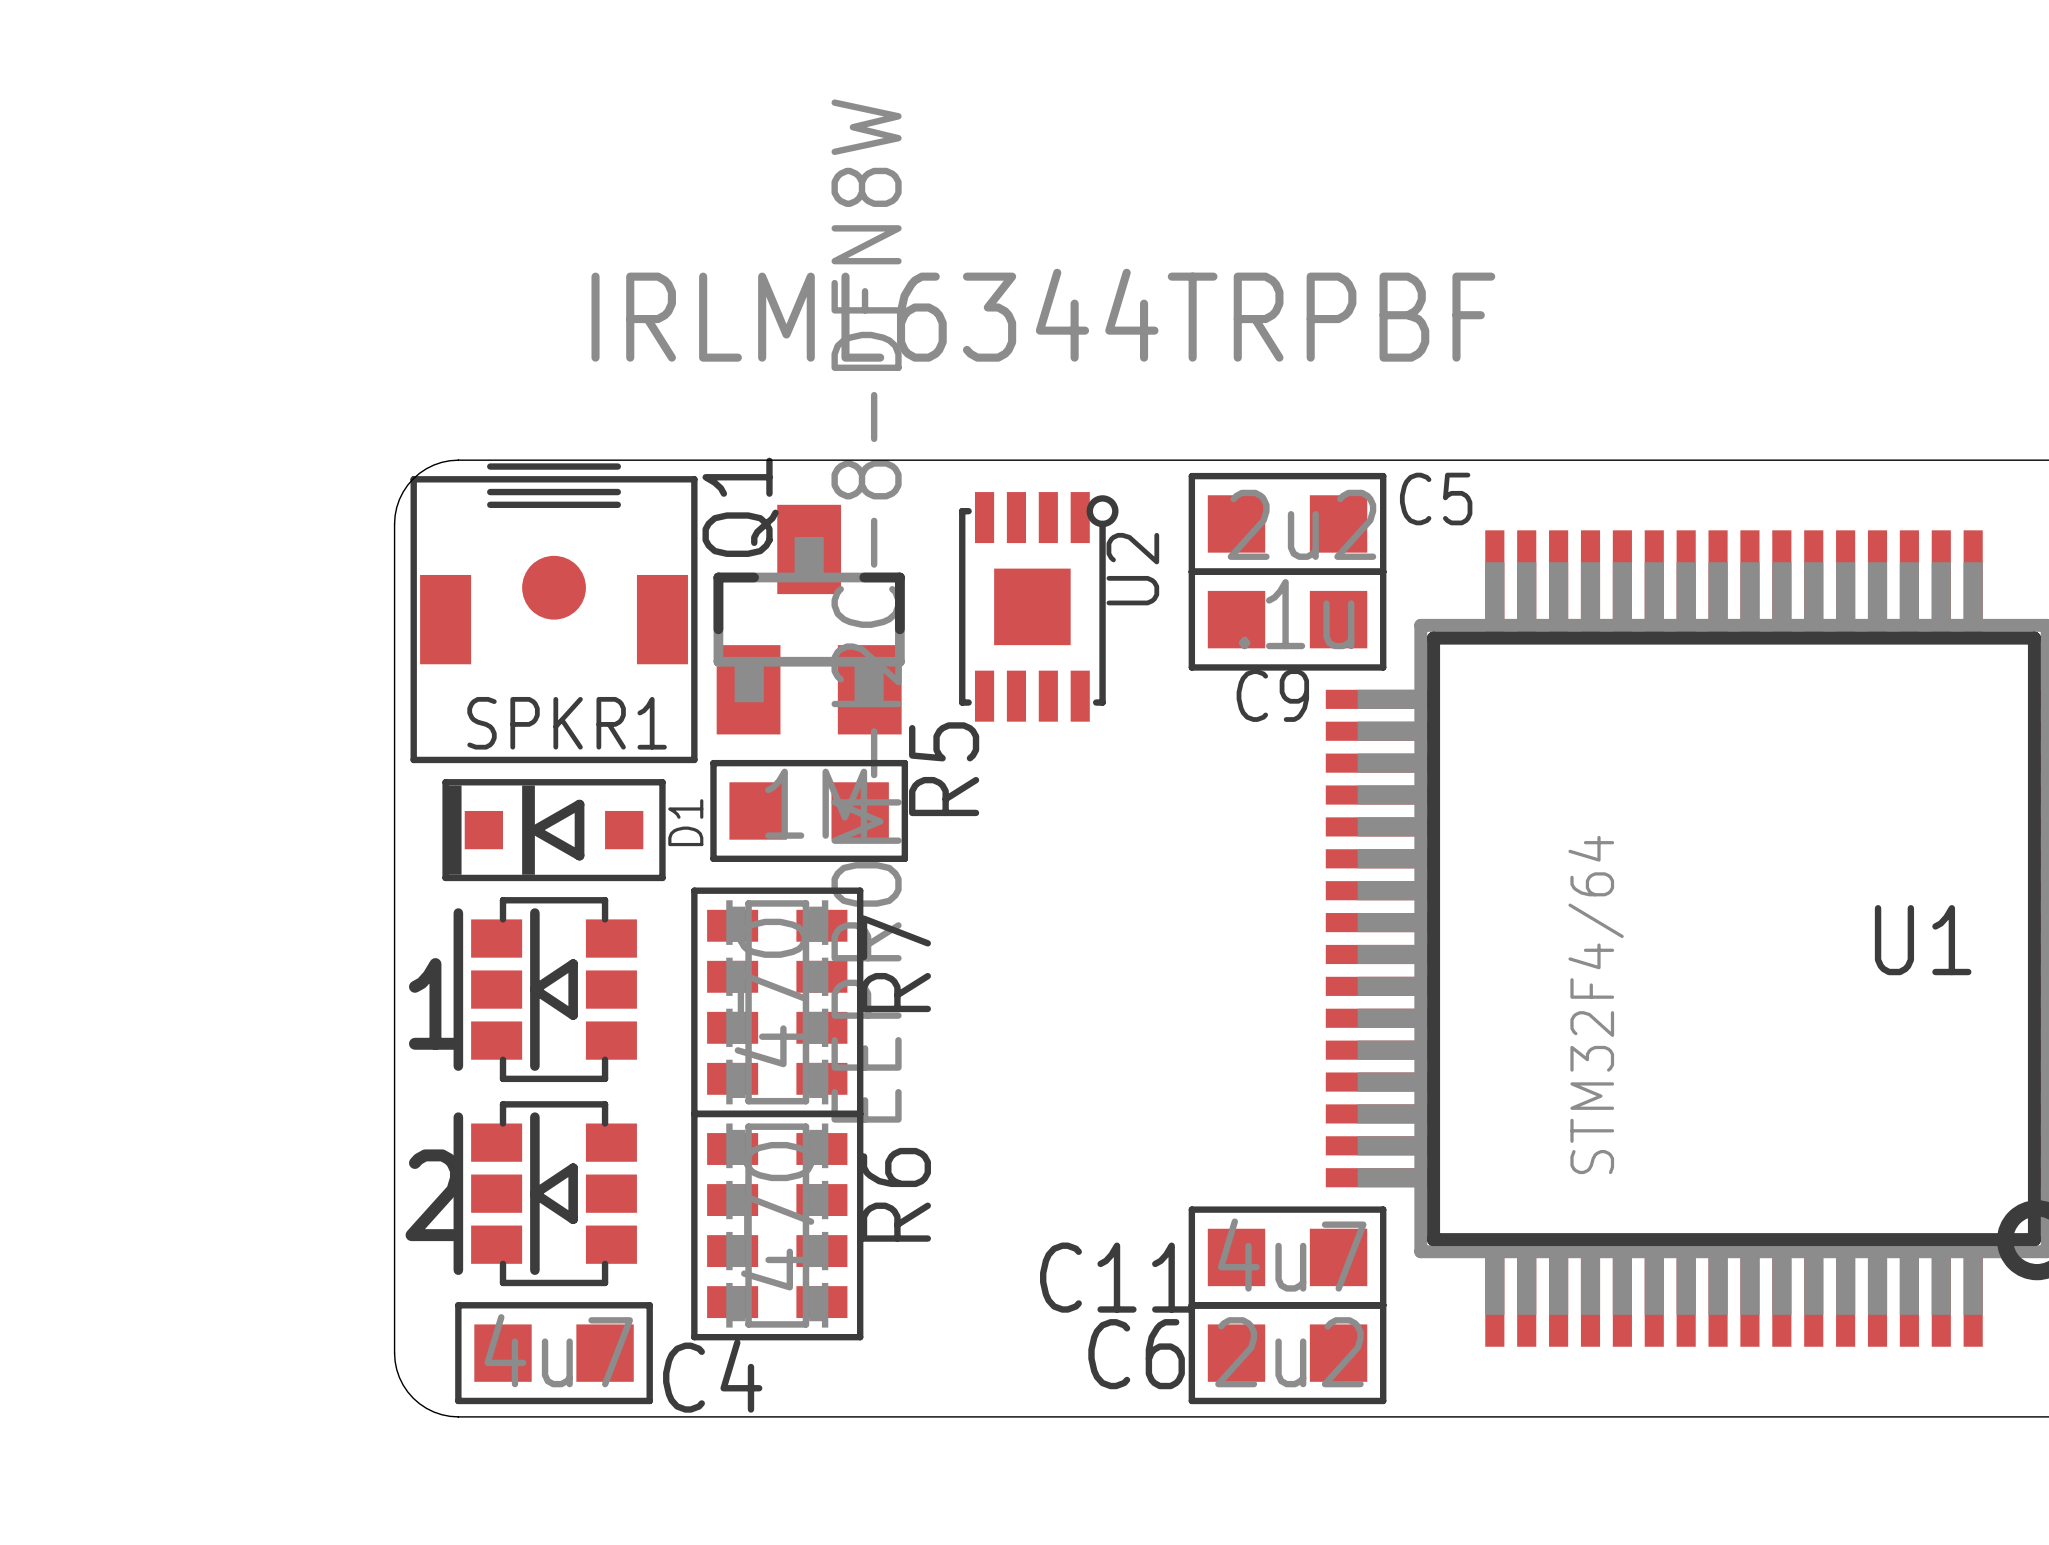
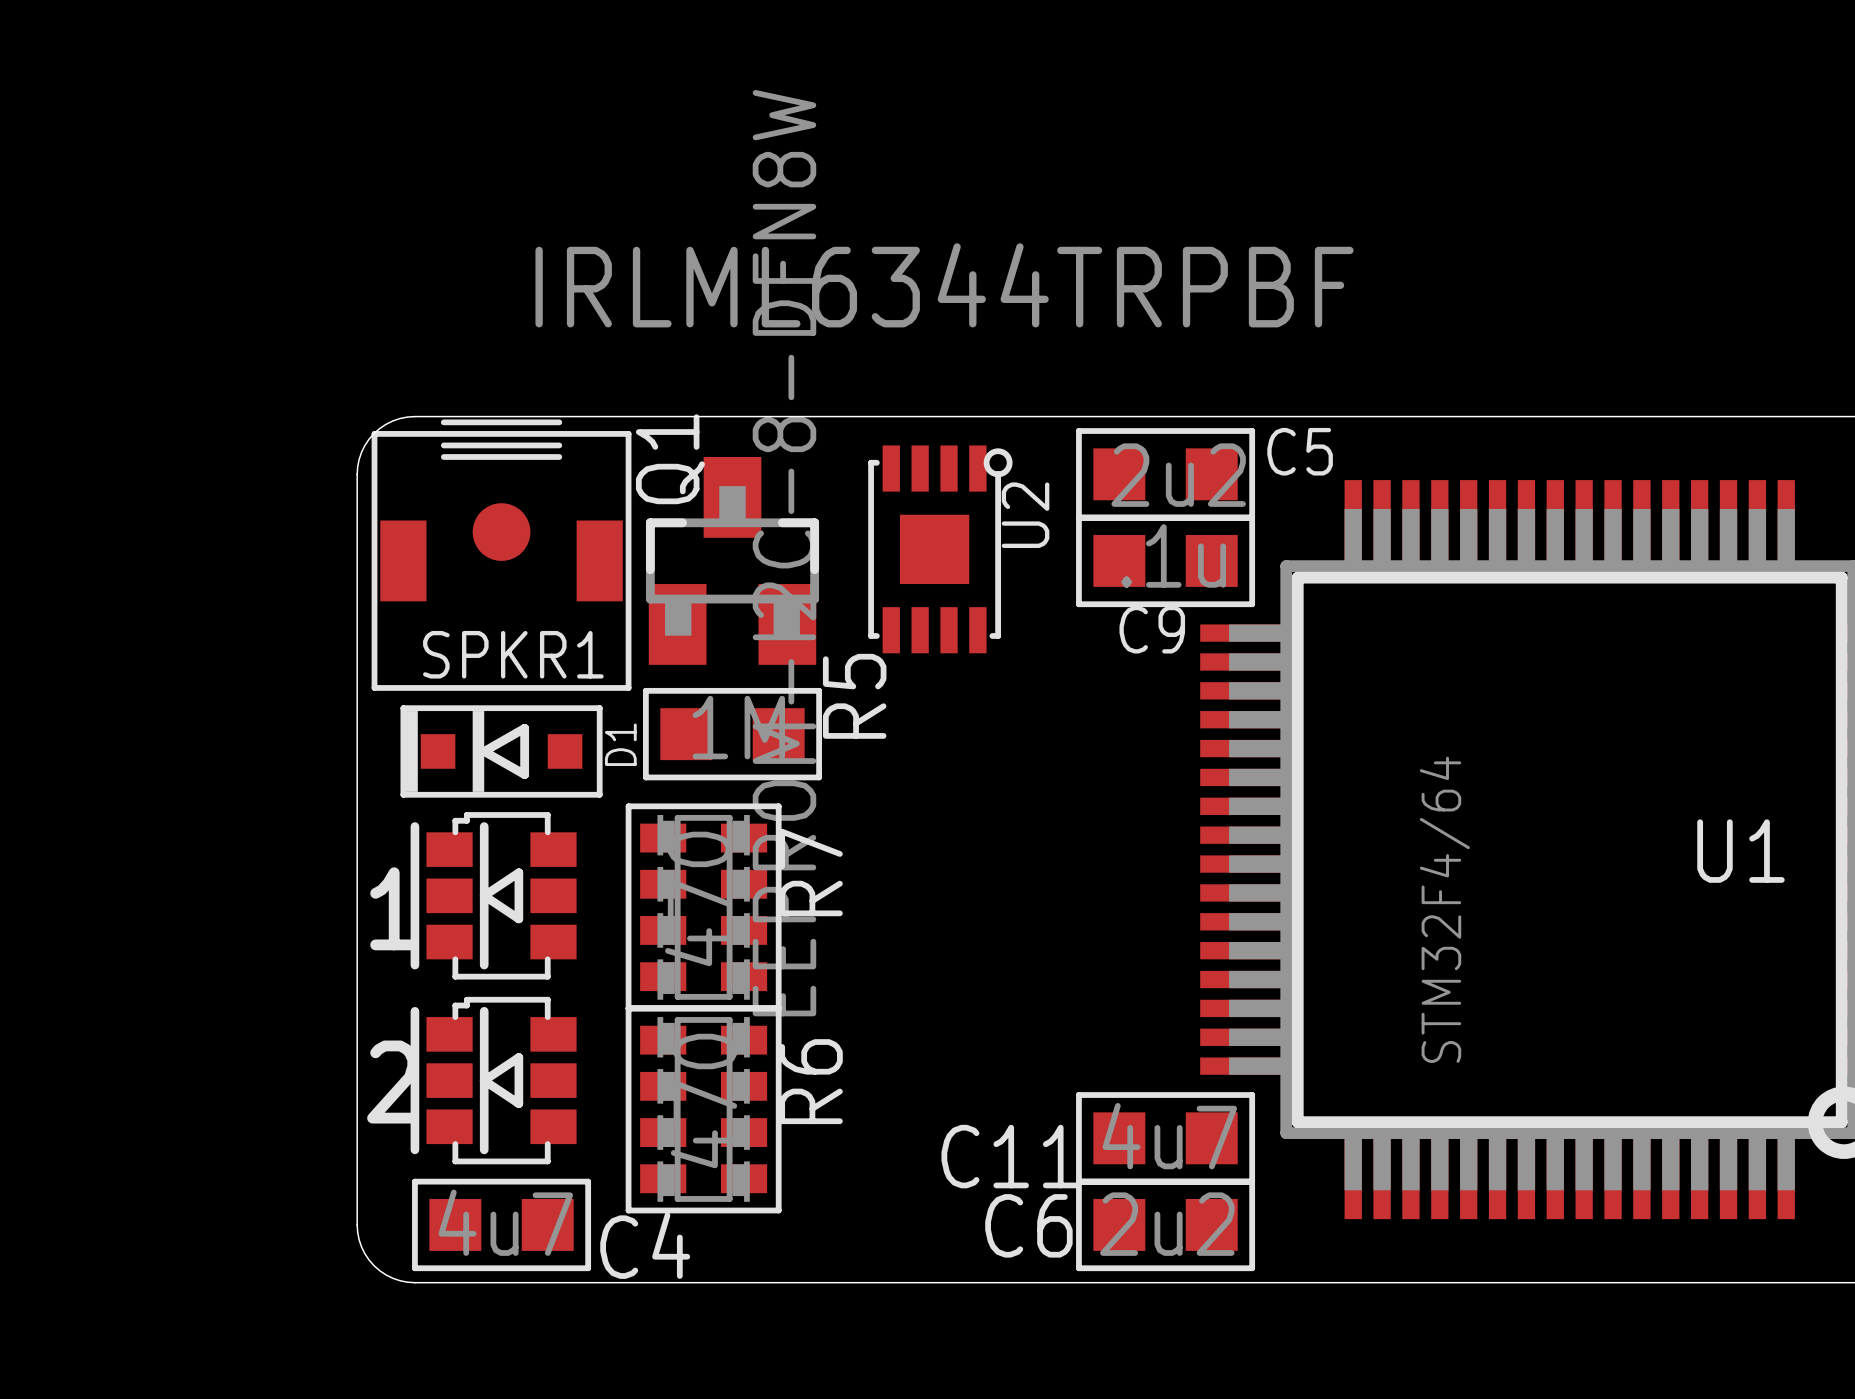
part footprint: [453, 897, 637, 1083] -> [410, 812, 577, 980]
part footprint: [453, 1101, 637, 1287] -> [410, 996, 577, 1165]

